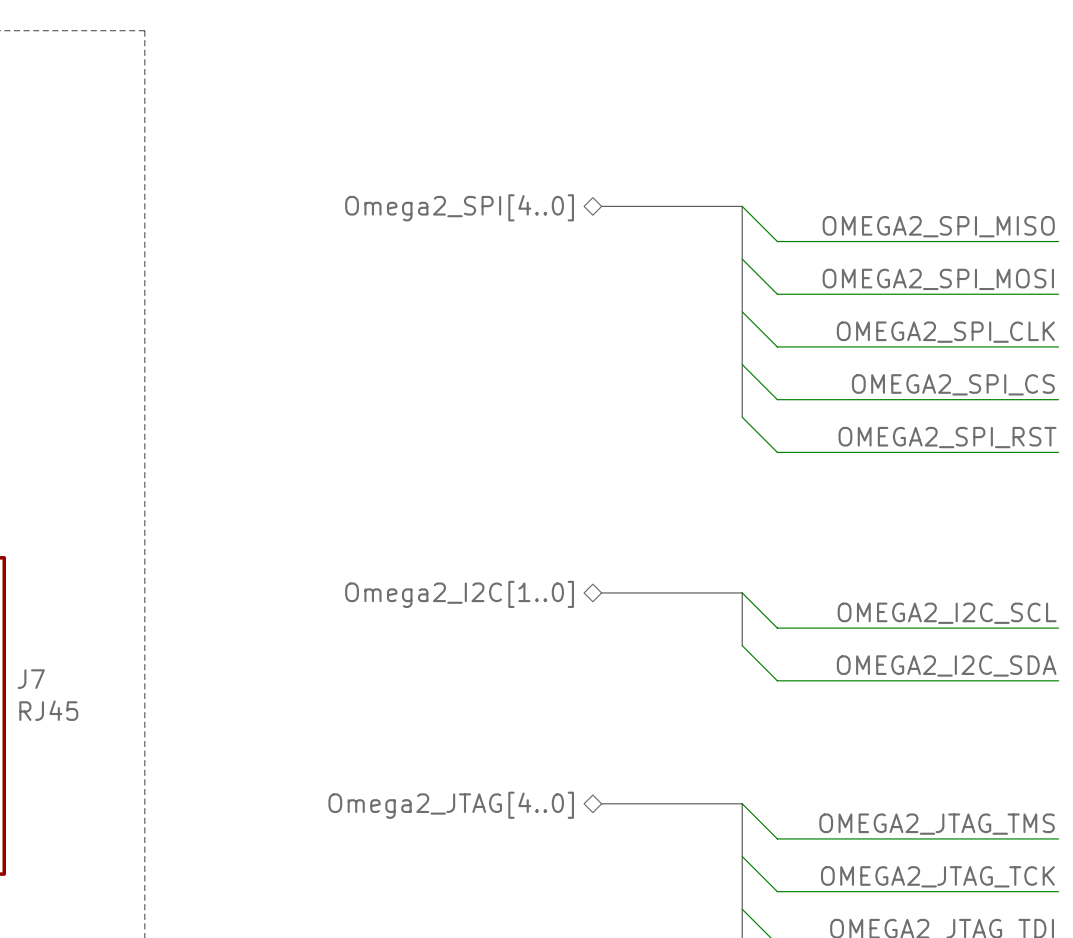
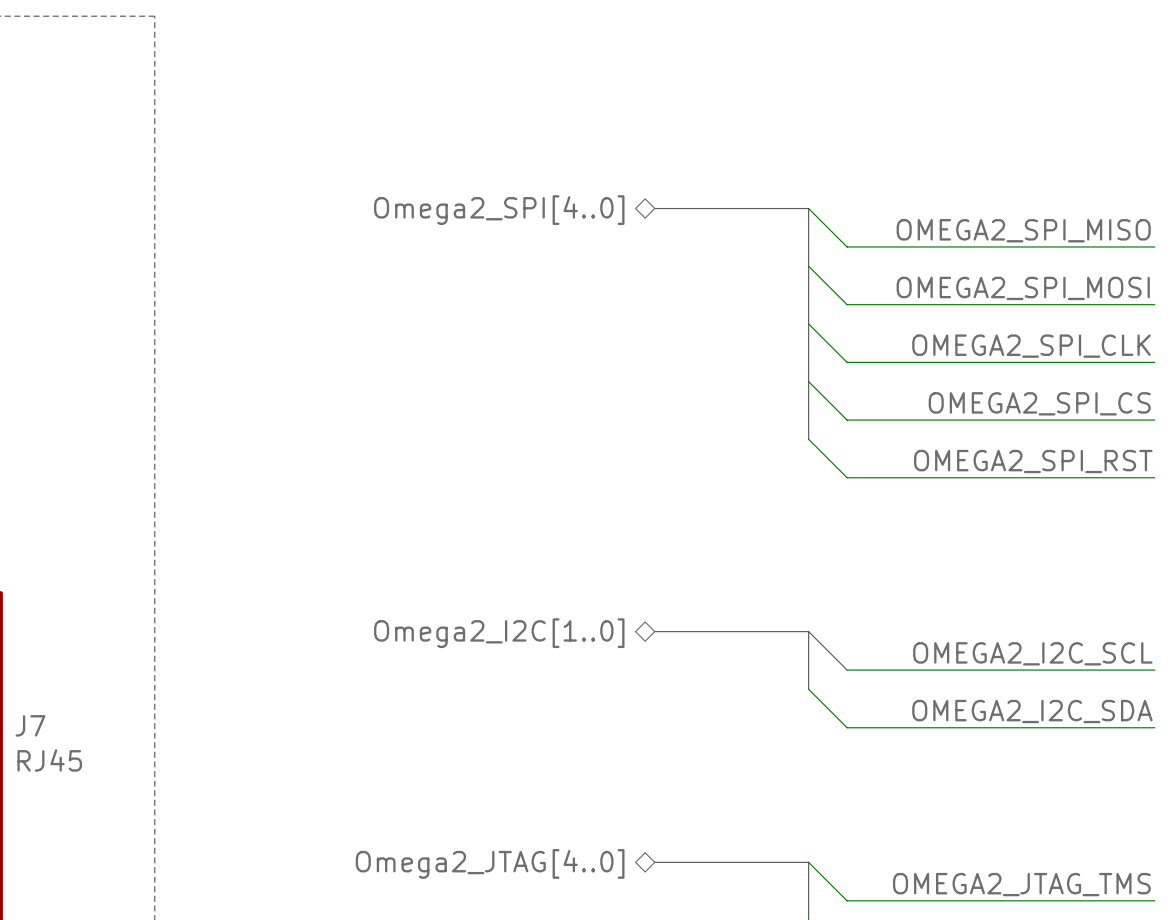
bus: none -> (808, 631) (847, 670)

